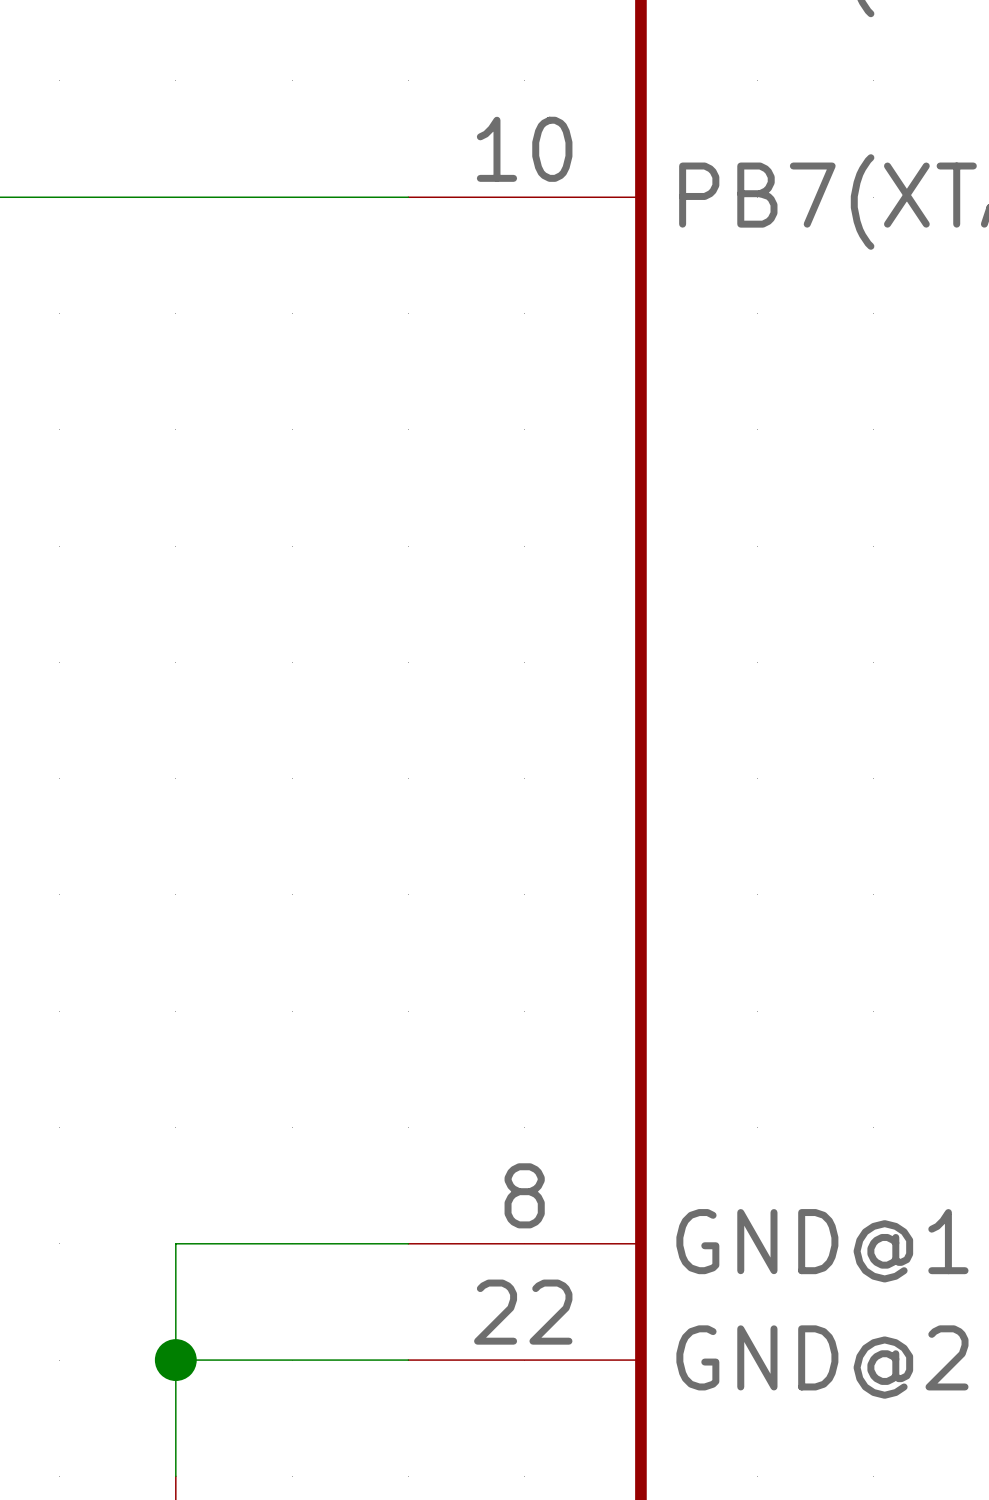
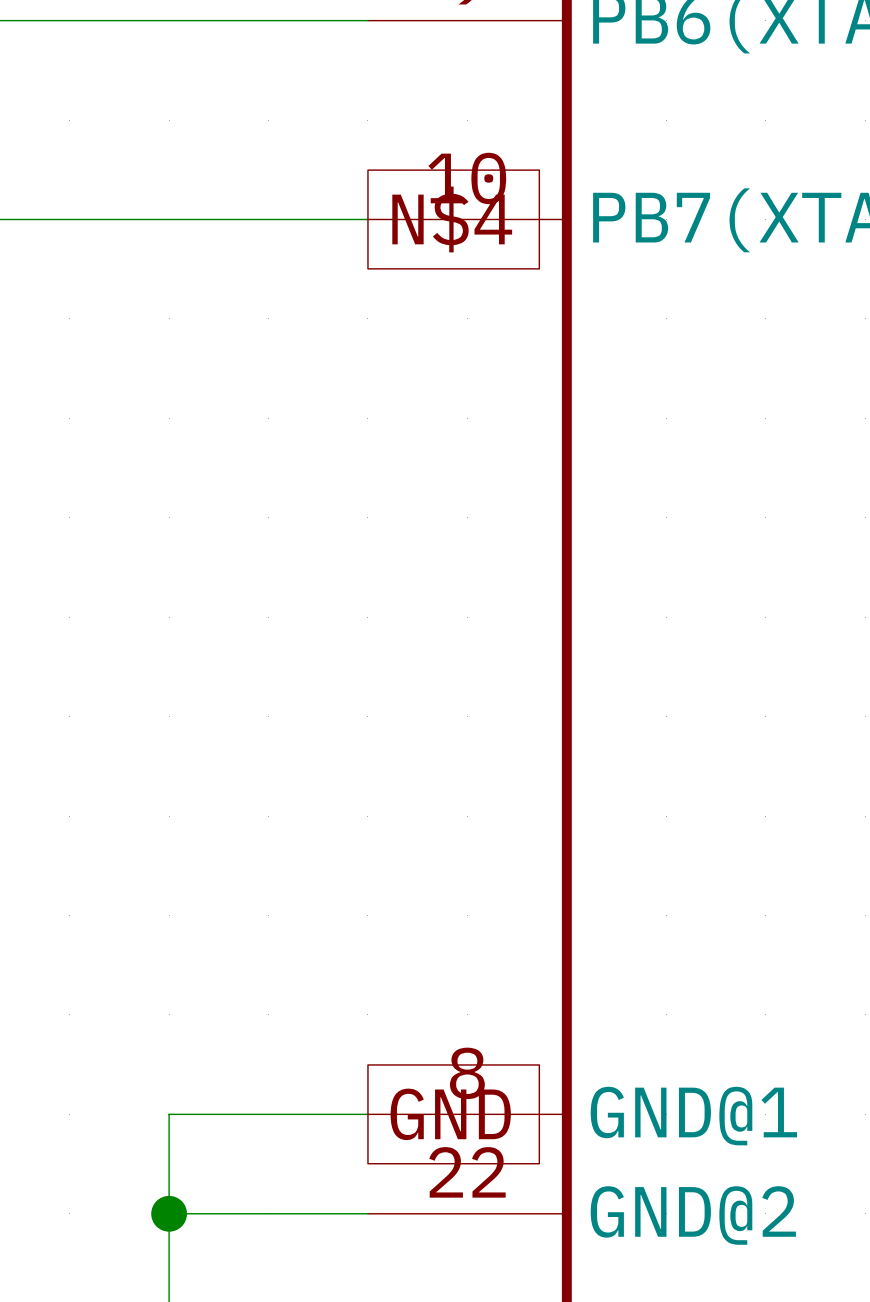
global label: none -> N$4 (452, 219)
global label: none -> GND (450, 1114)

